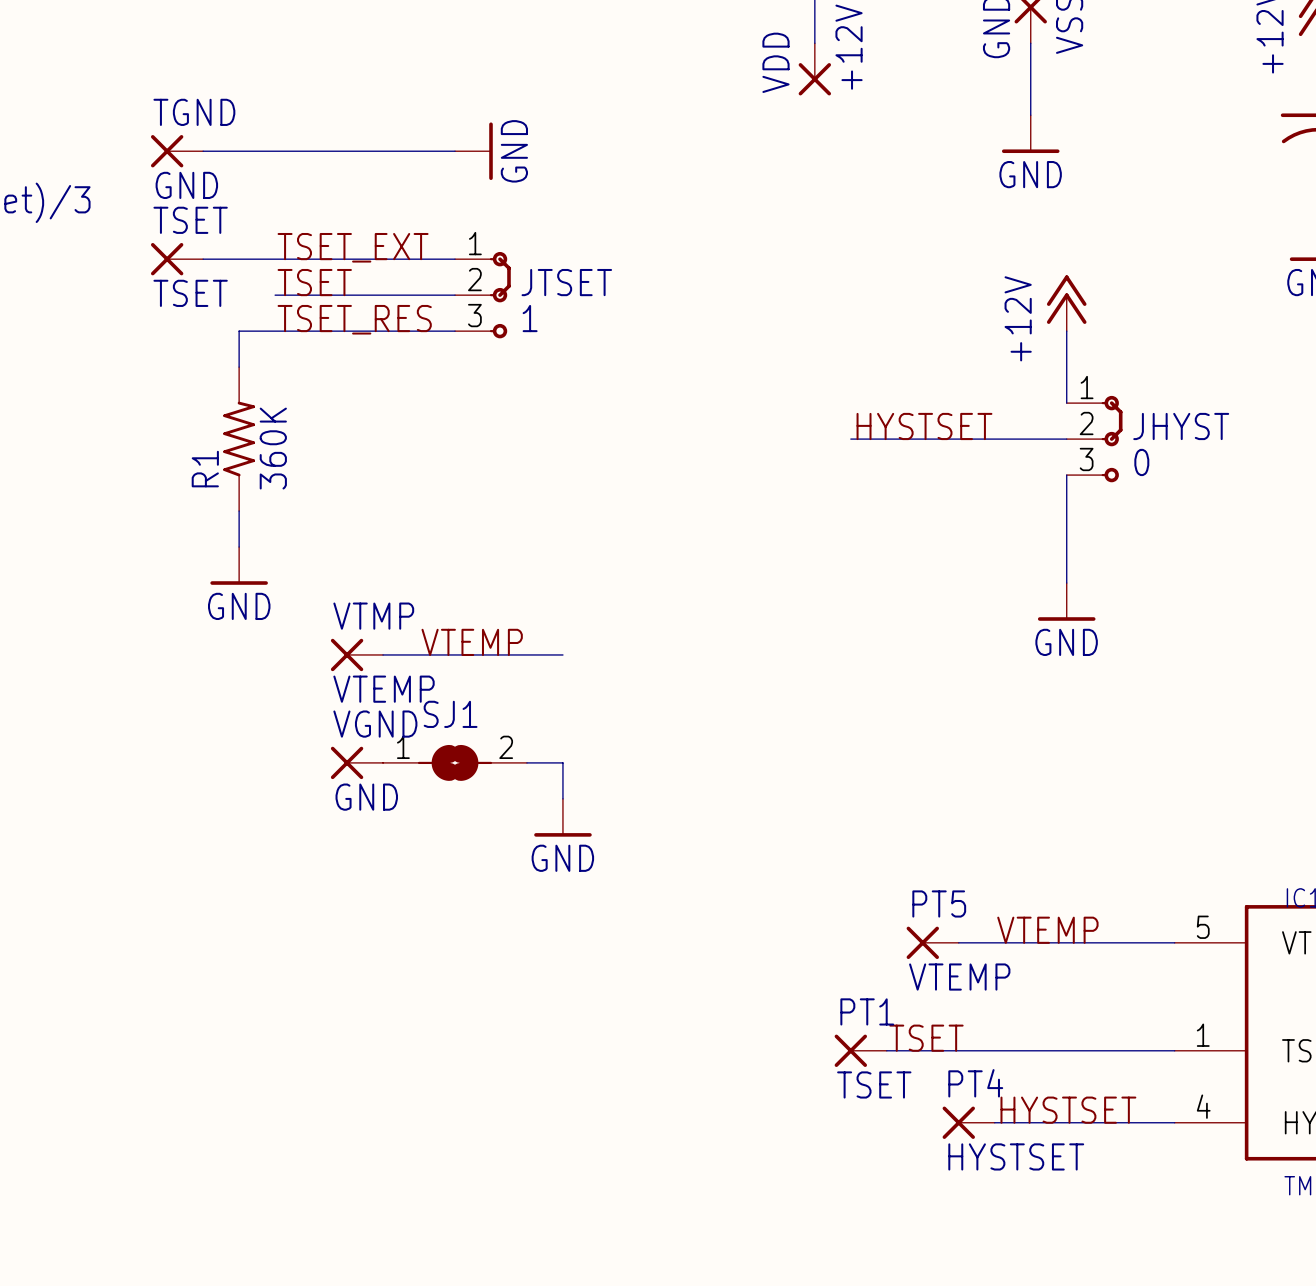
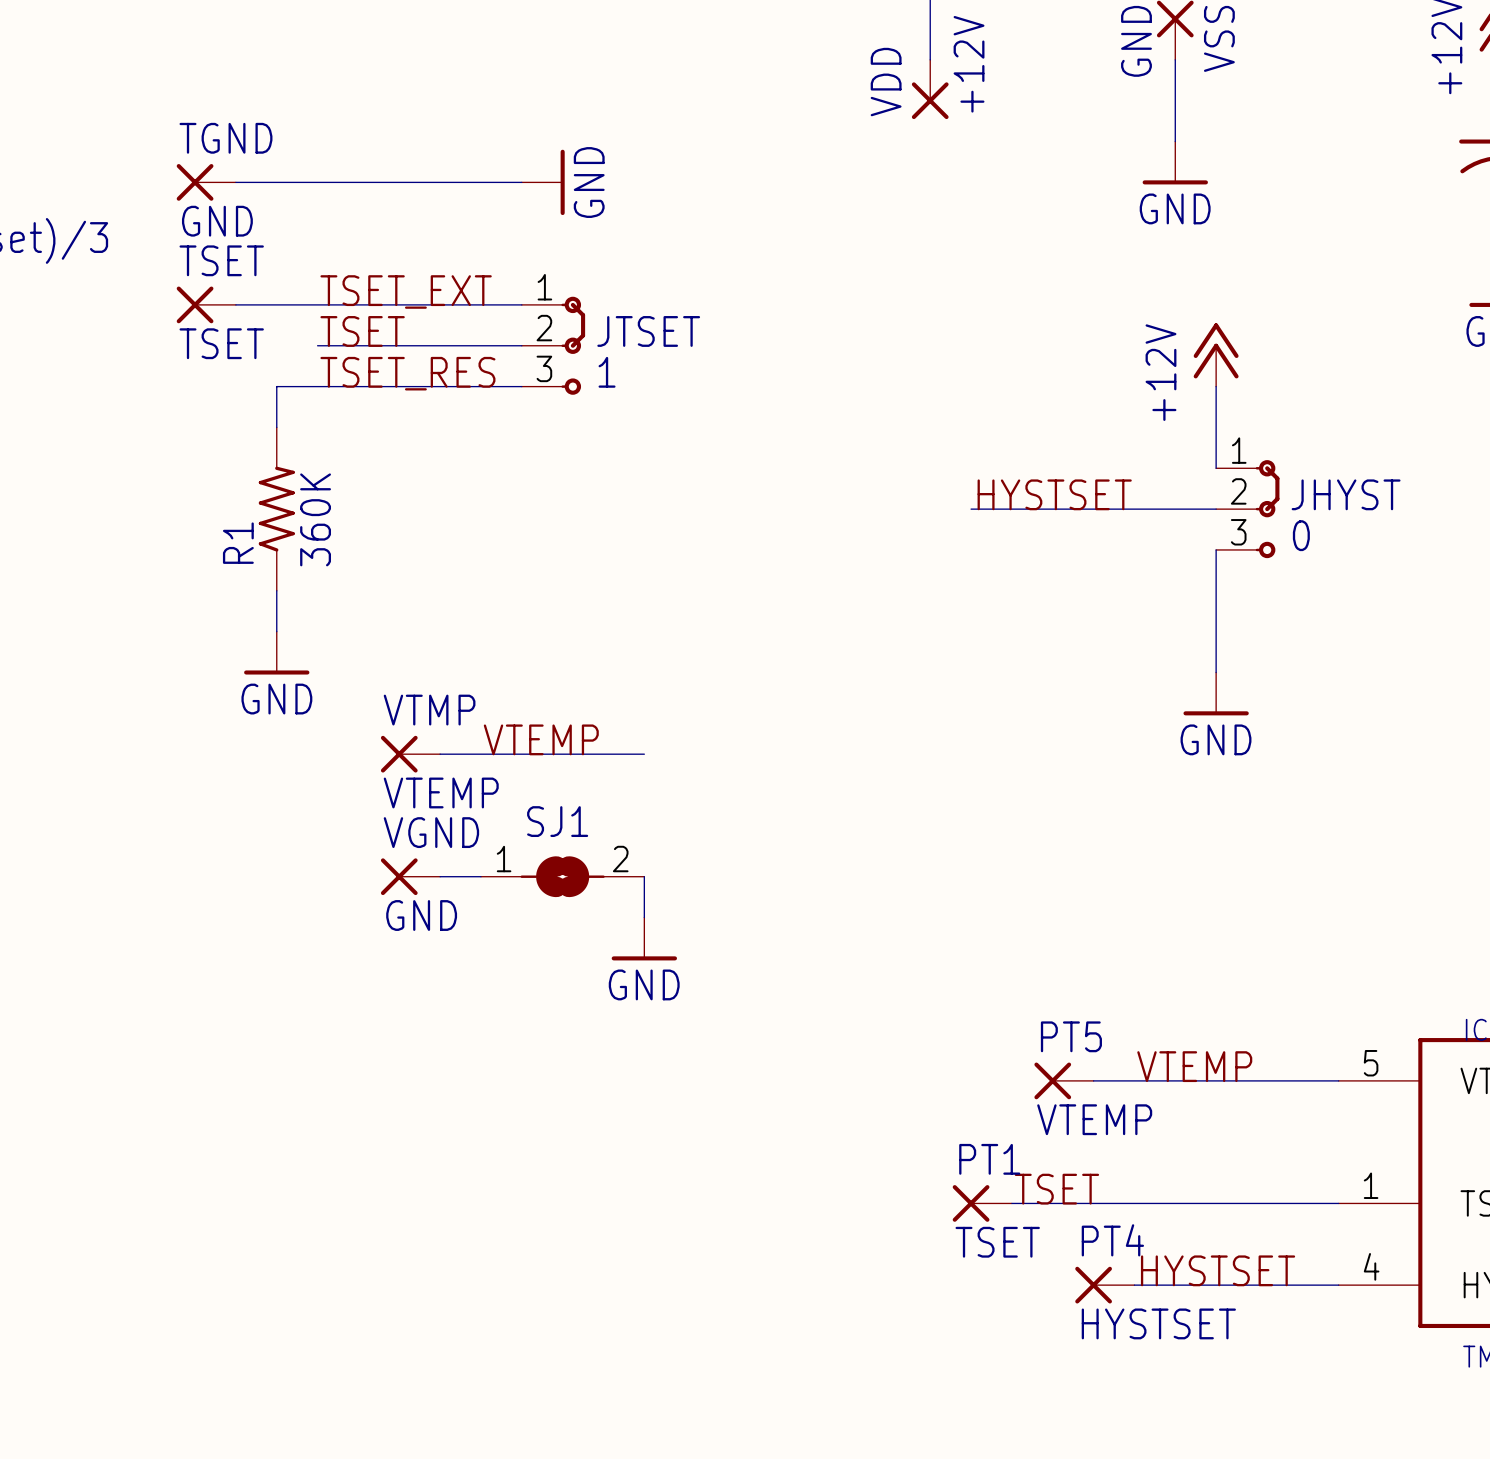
SJ1 position: (455, 762) -> (562, 876)

